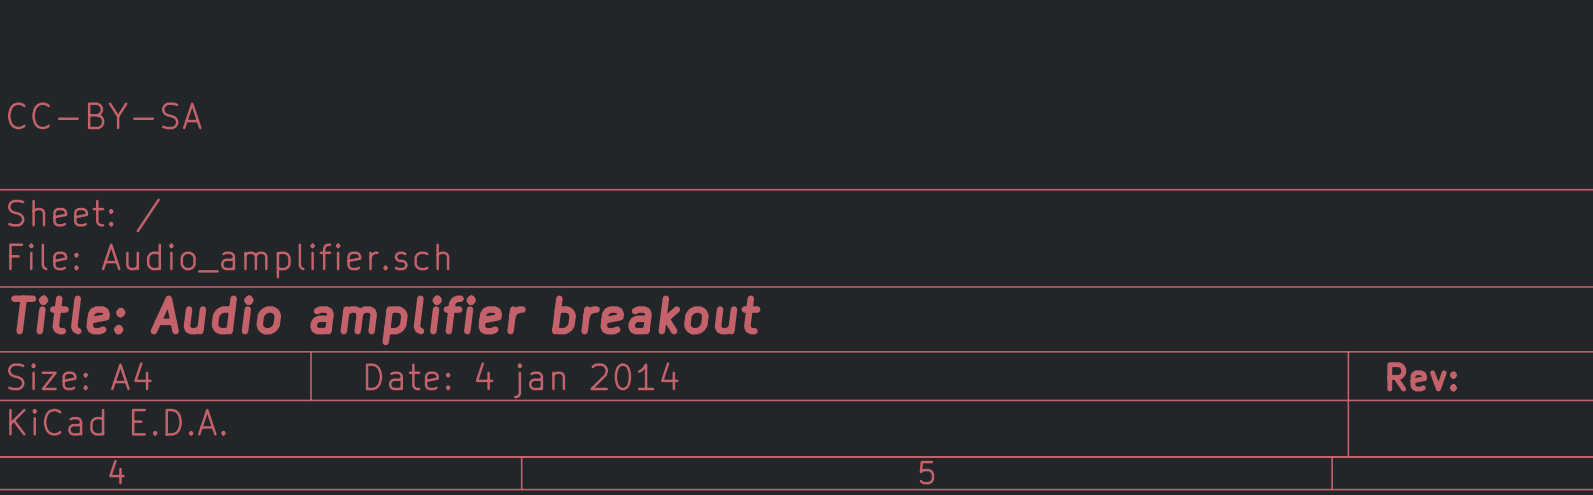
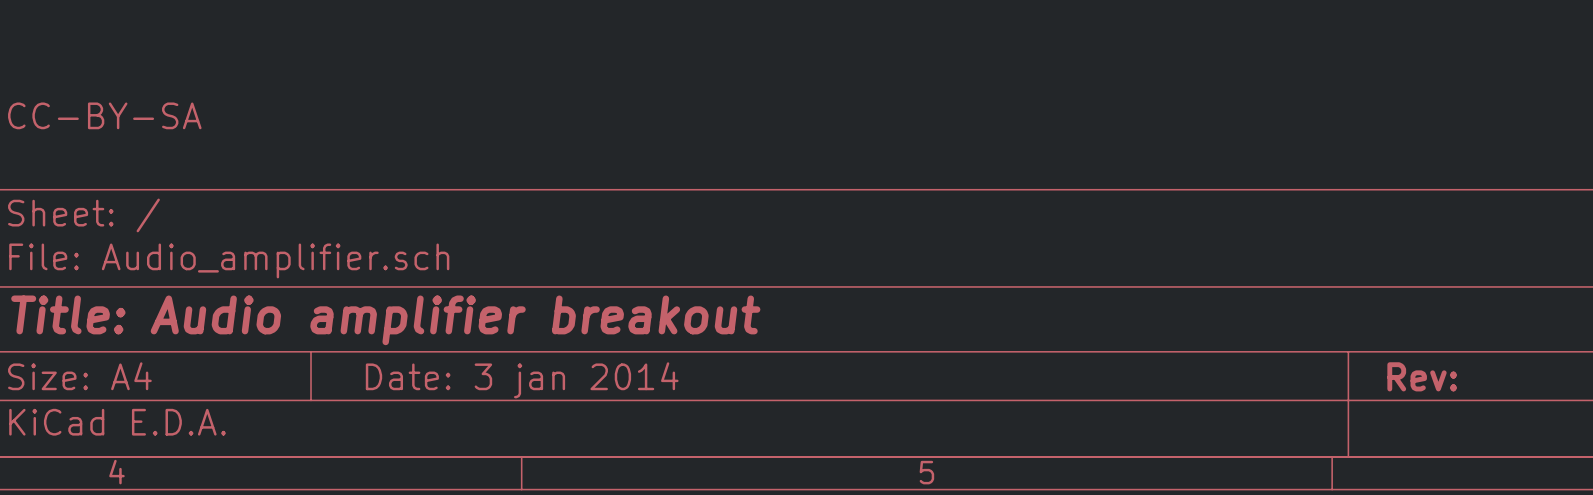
title block: Date: 4 jan 2014 (522, 380) -> Date: 3 jan 2014 (522, 380)

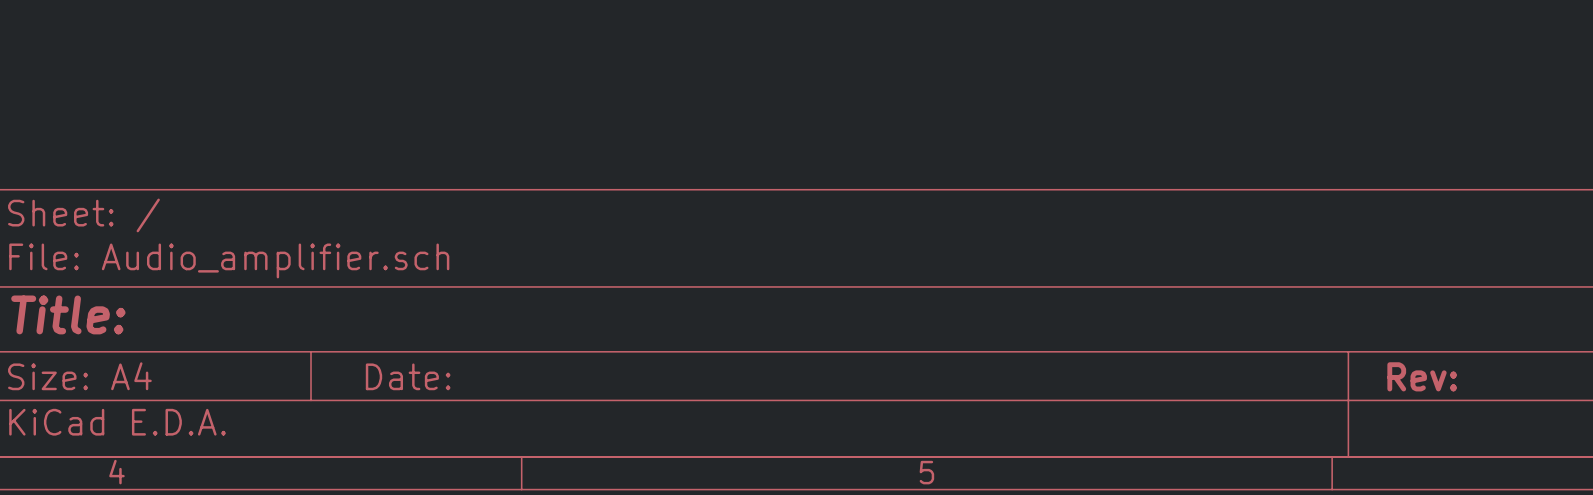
title block: CC-BY-SA (104, 115) -> none
title block: Title: Audio amplifier breakout (385, 320) -> Title: (68, 314)
title block: Date: 3 jan 2014 (522, 380) -> Date: (408, 376)

